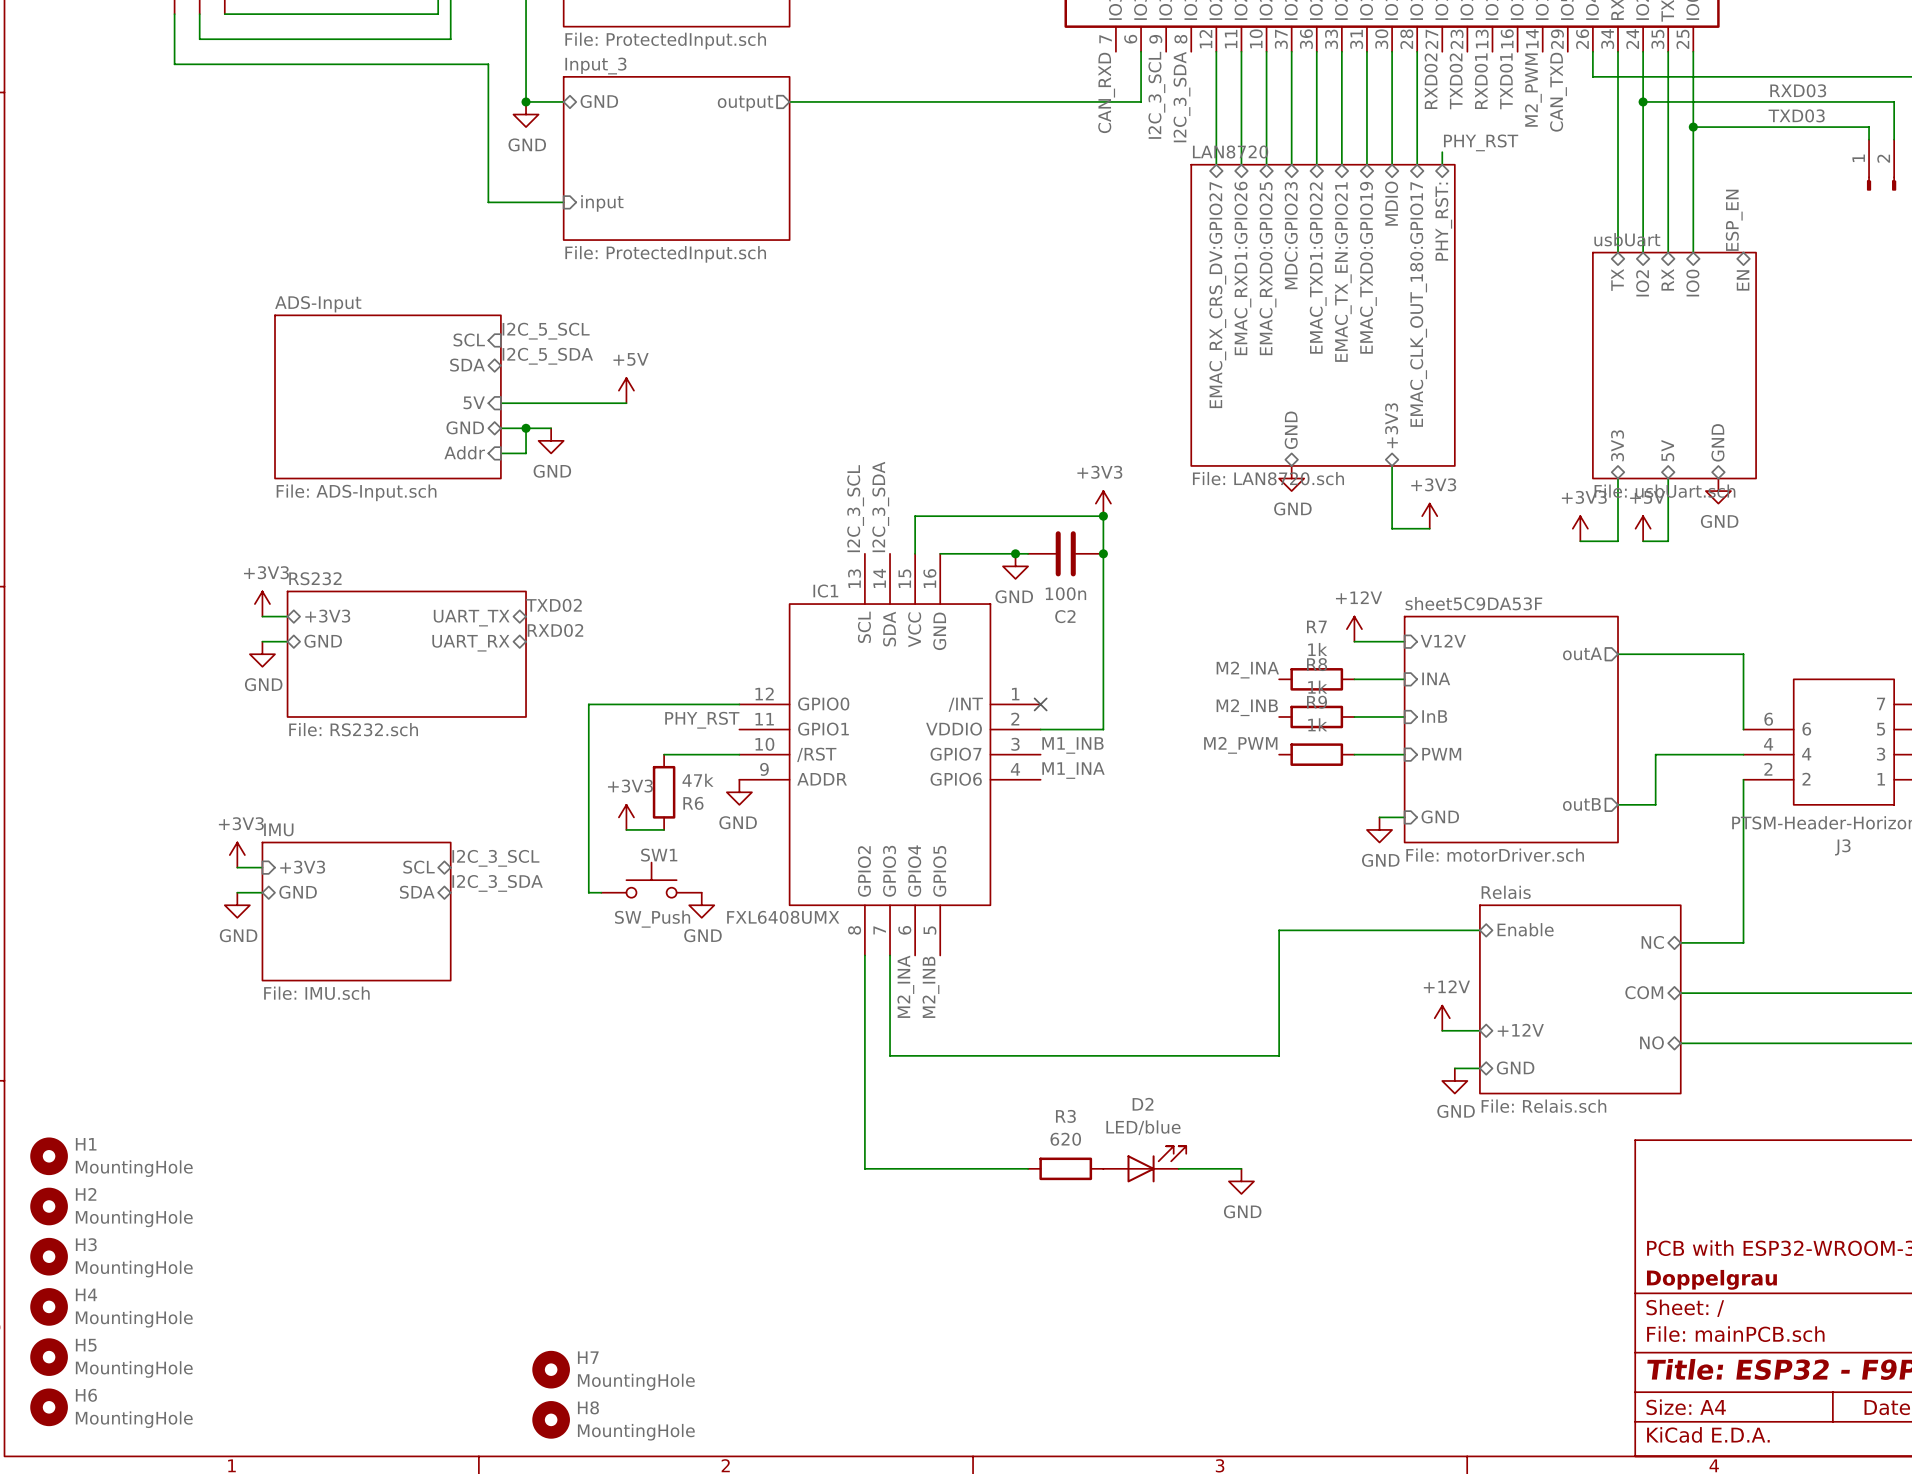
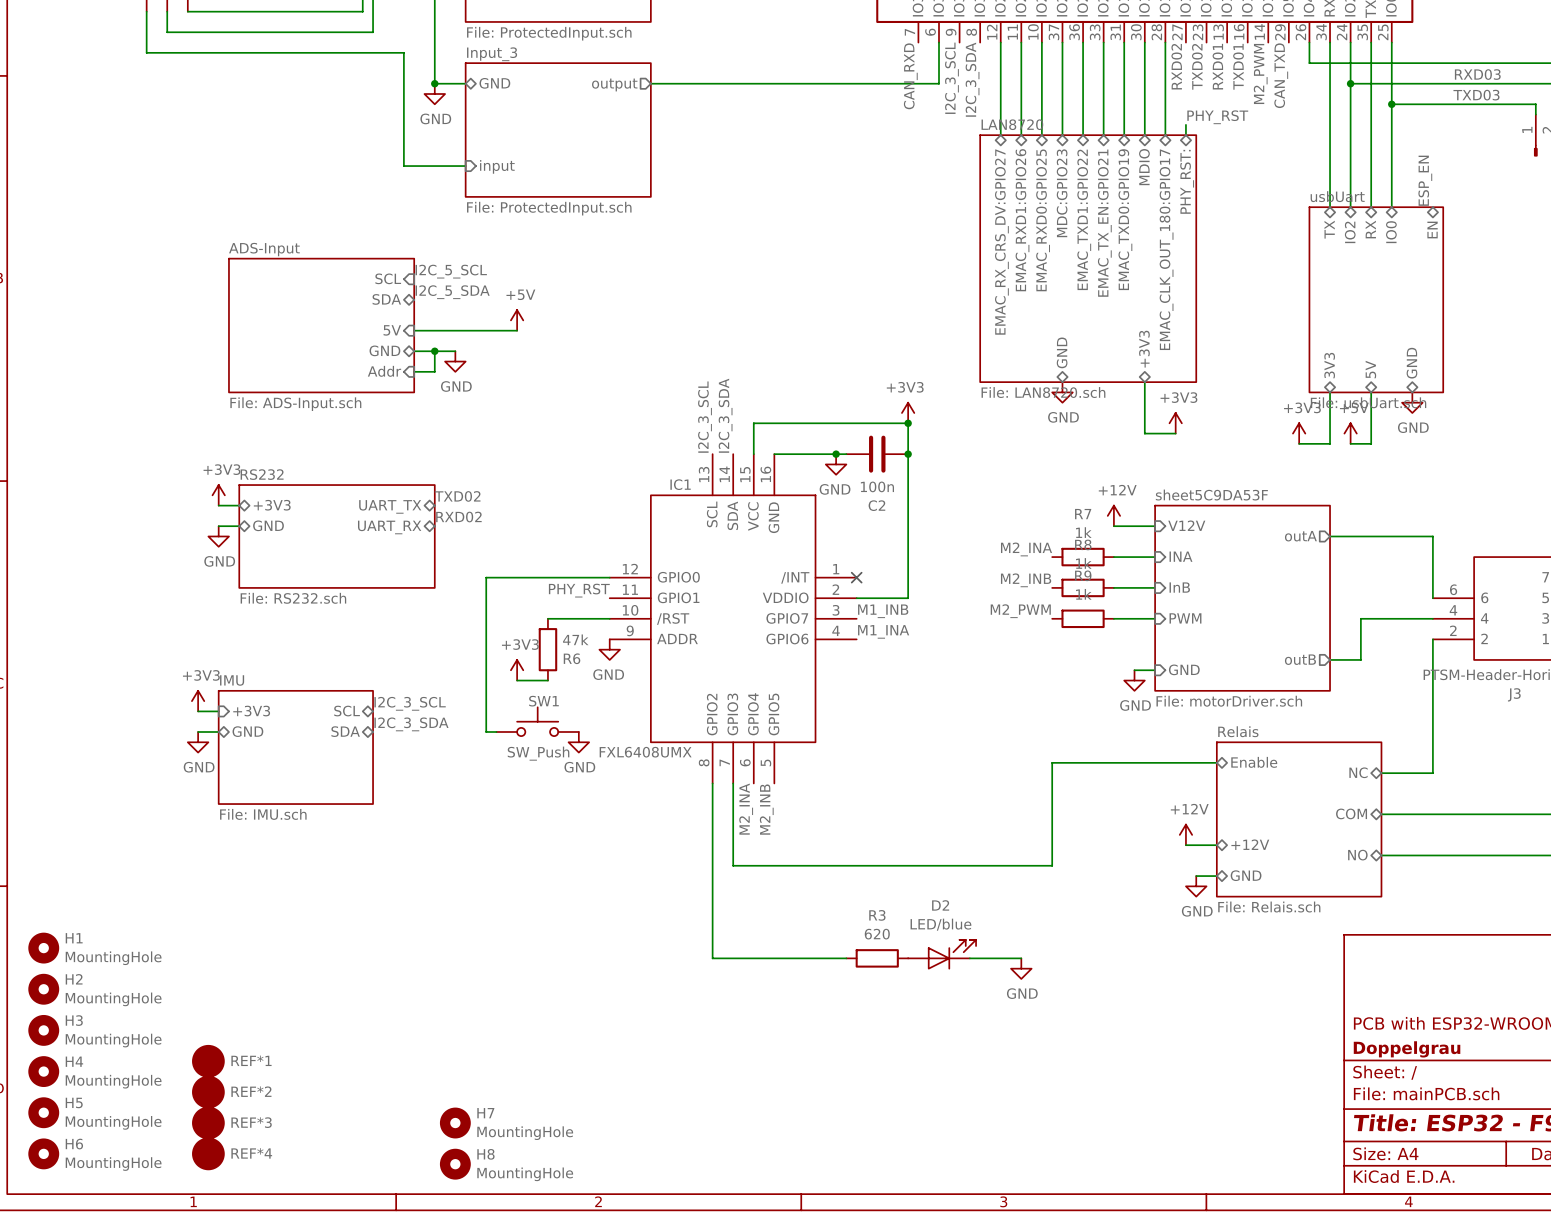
REF*1: none -> (208, 1061)
REF*2: none -> (208, 1092)
REF*3: none -> (208, 1123)
REF*4: none -> (208, 1153)

